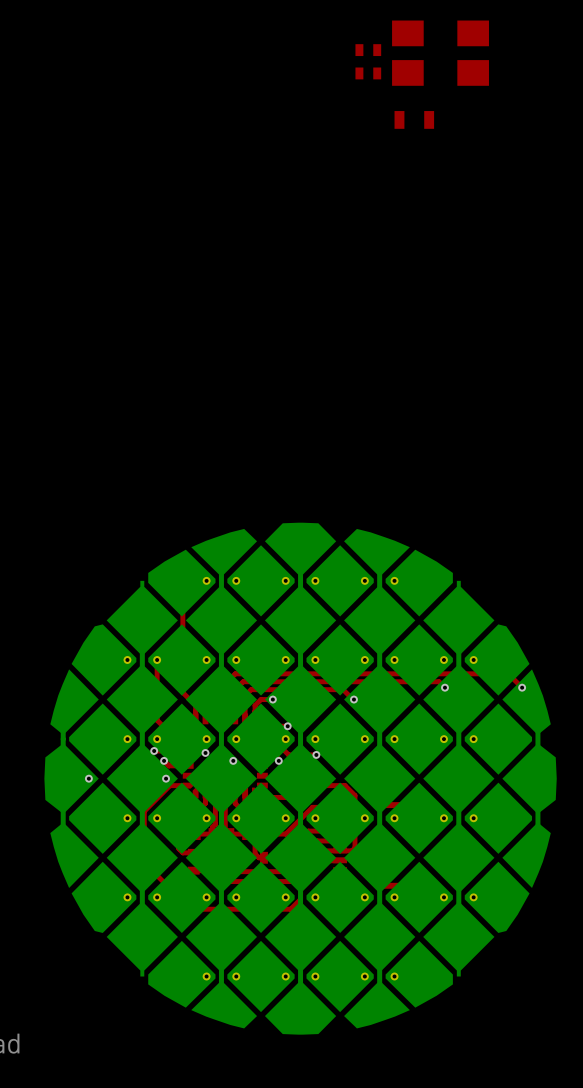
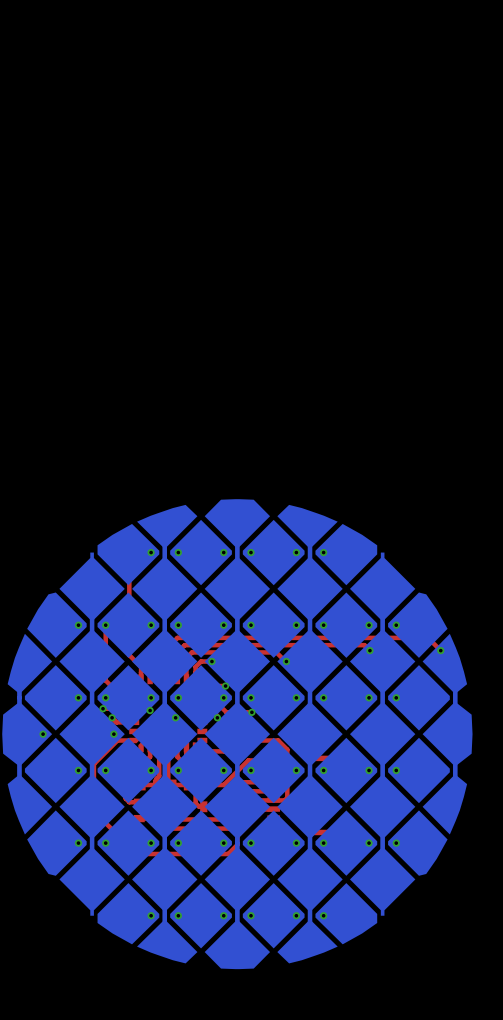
part: (368, 50) -> none
part: (440, 53) -> none
part: (368, 73) -> none
part: (414, 119) -> none

